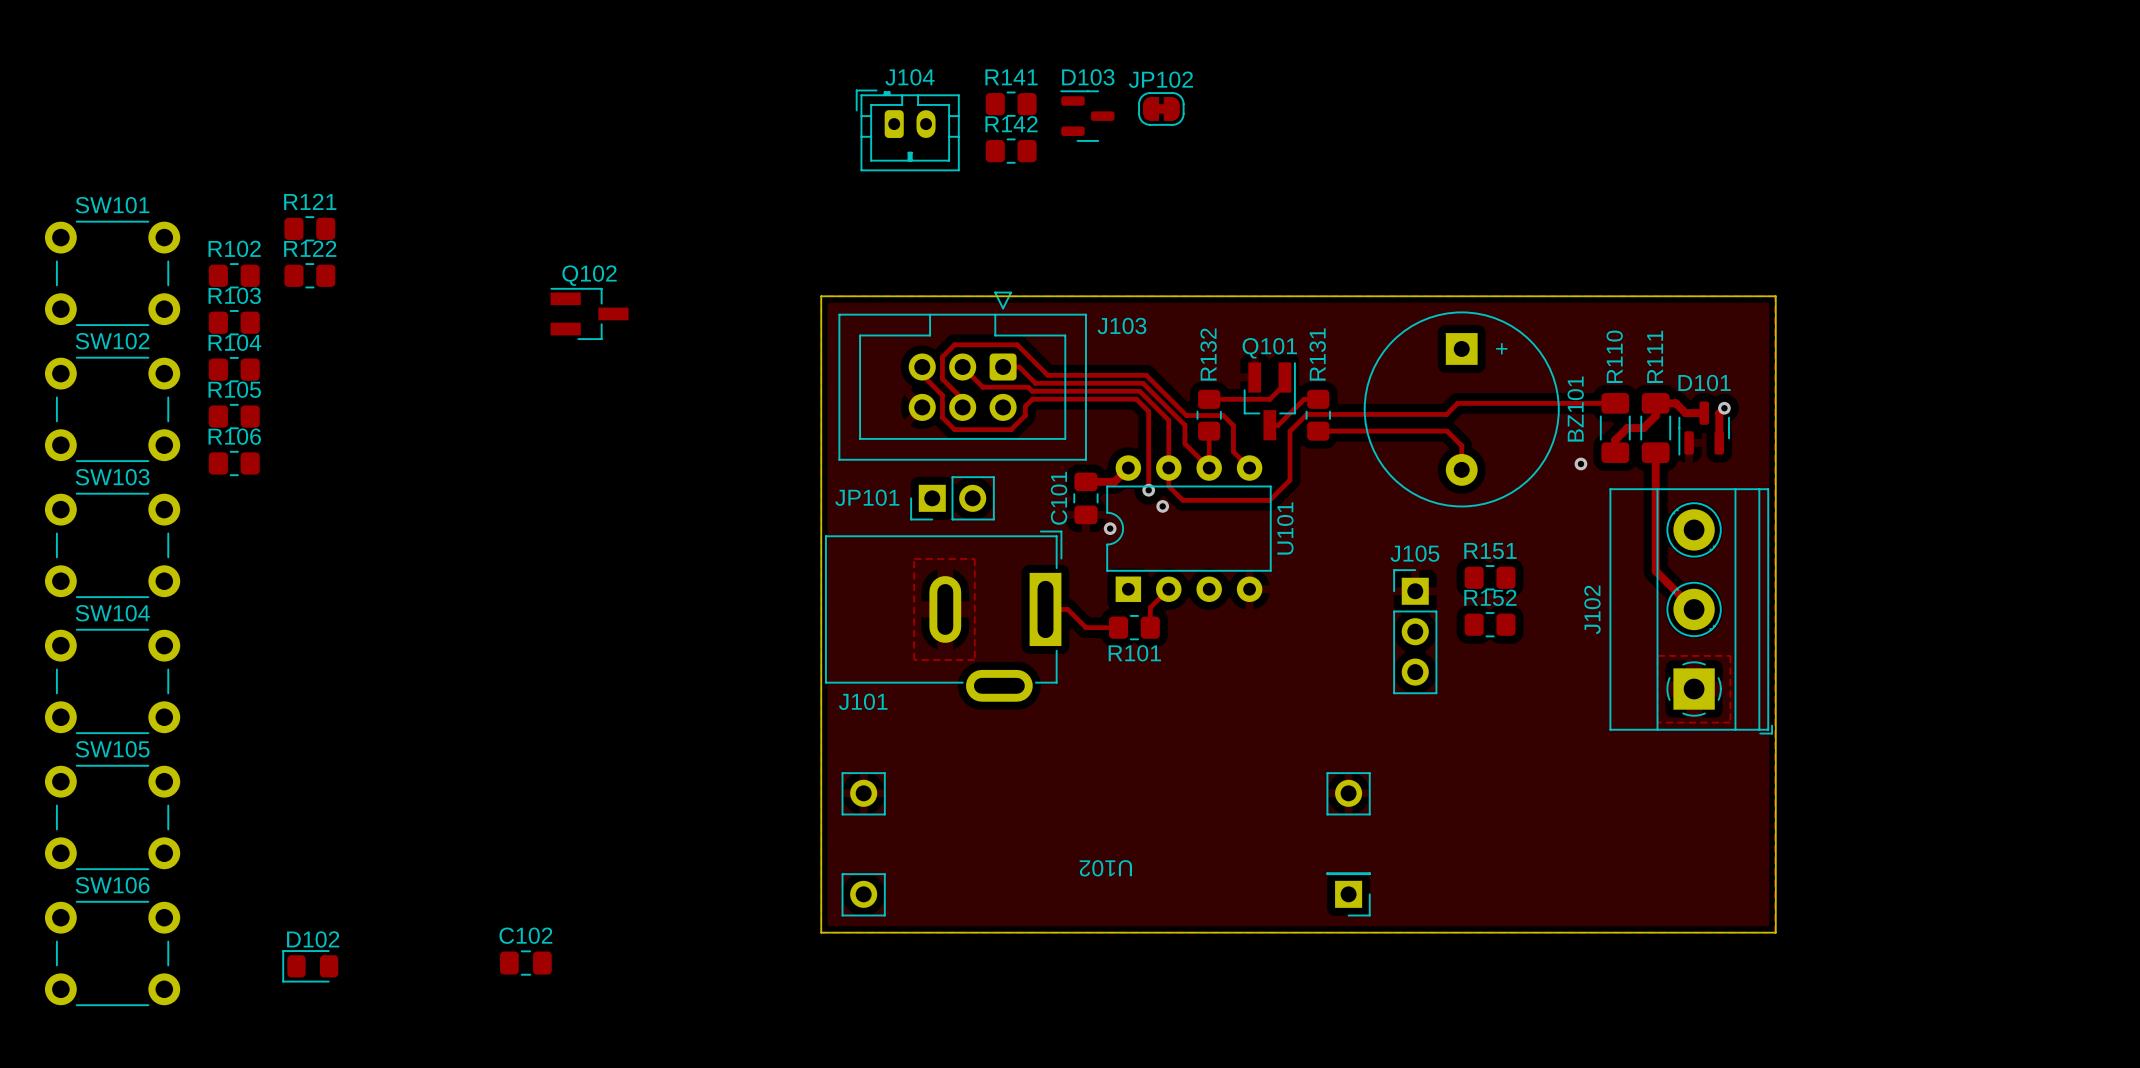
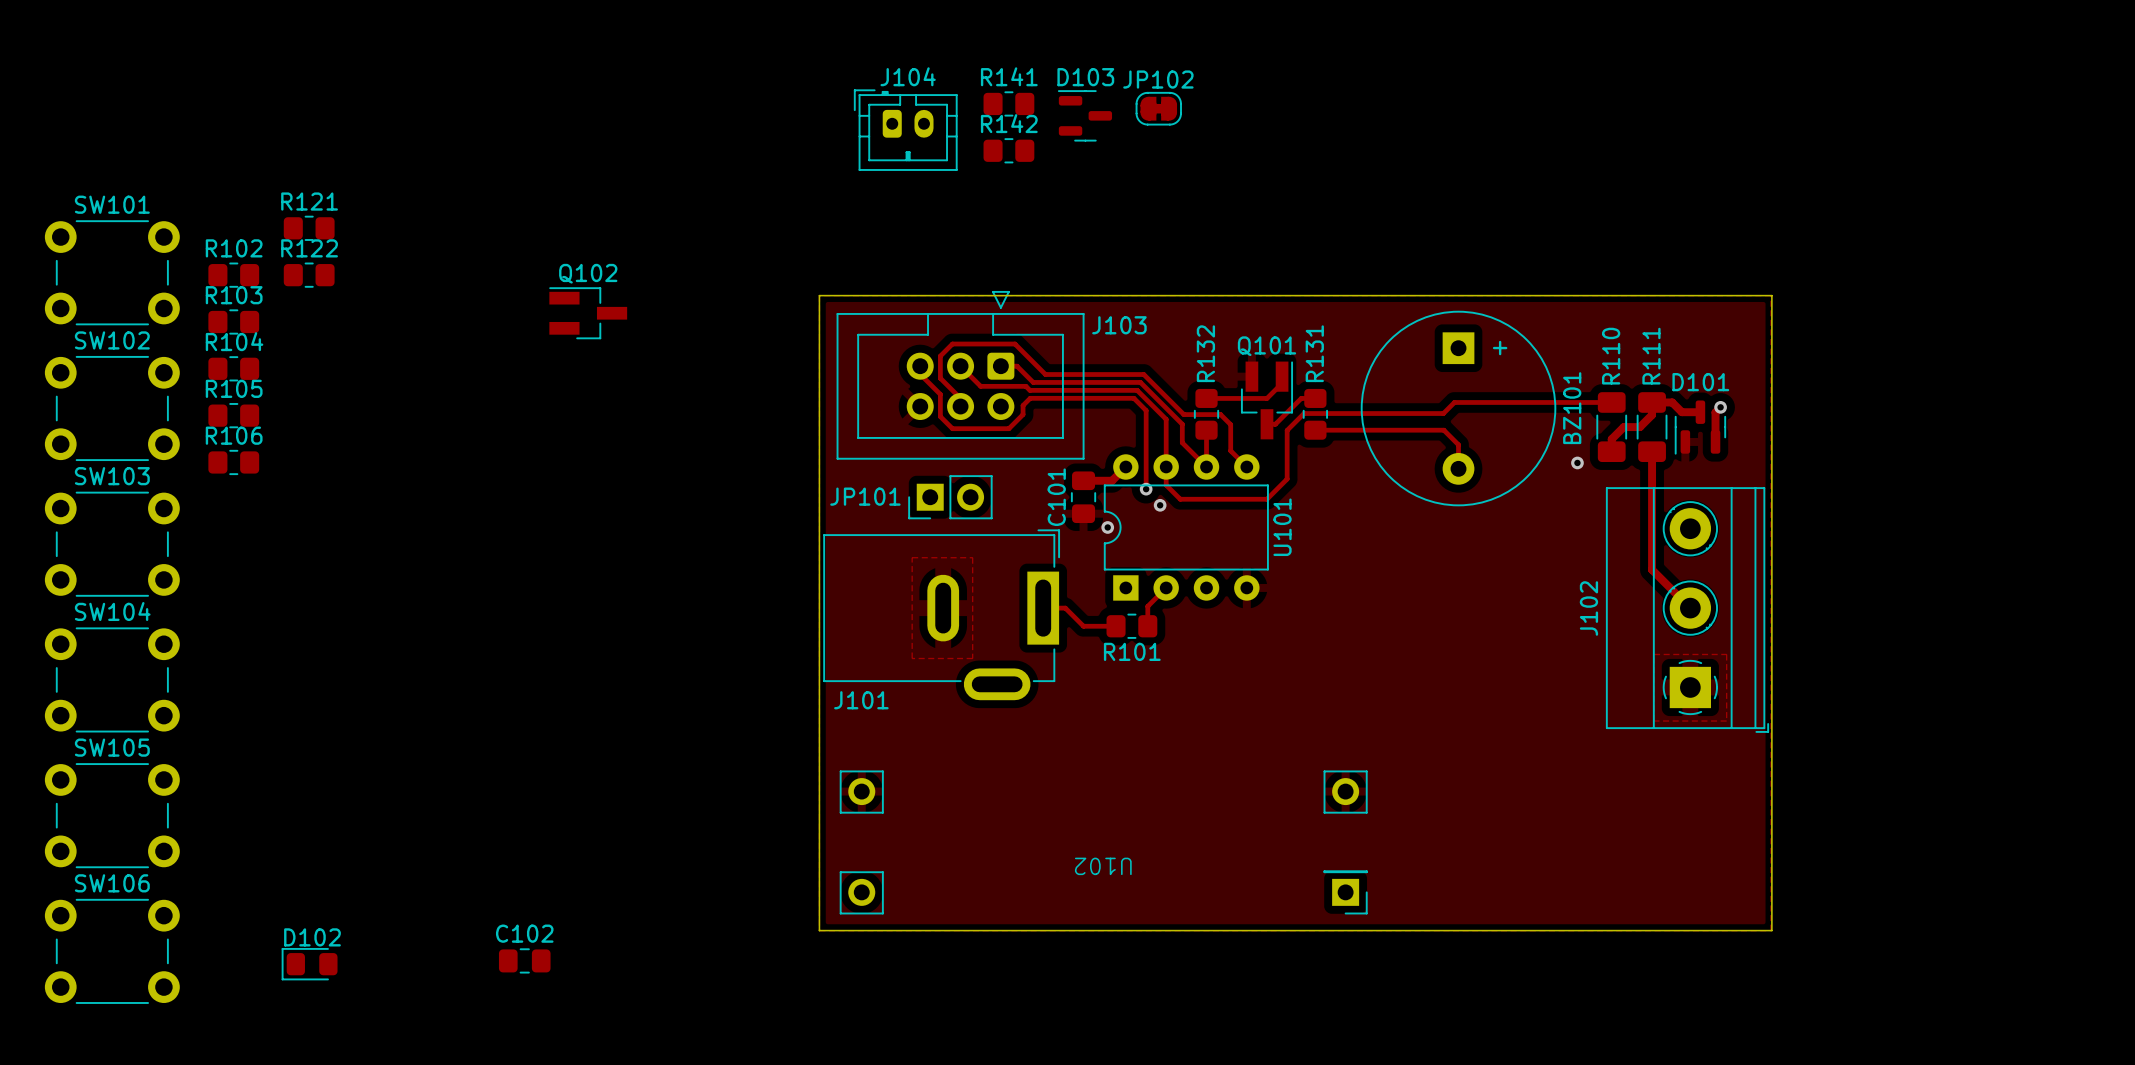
R151: (1490, 577) -> none
R152: (1490, 624) -> none
J105: (1415, 631) -> none

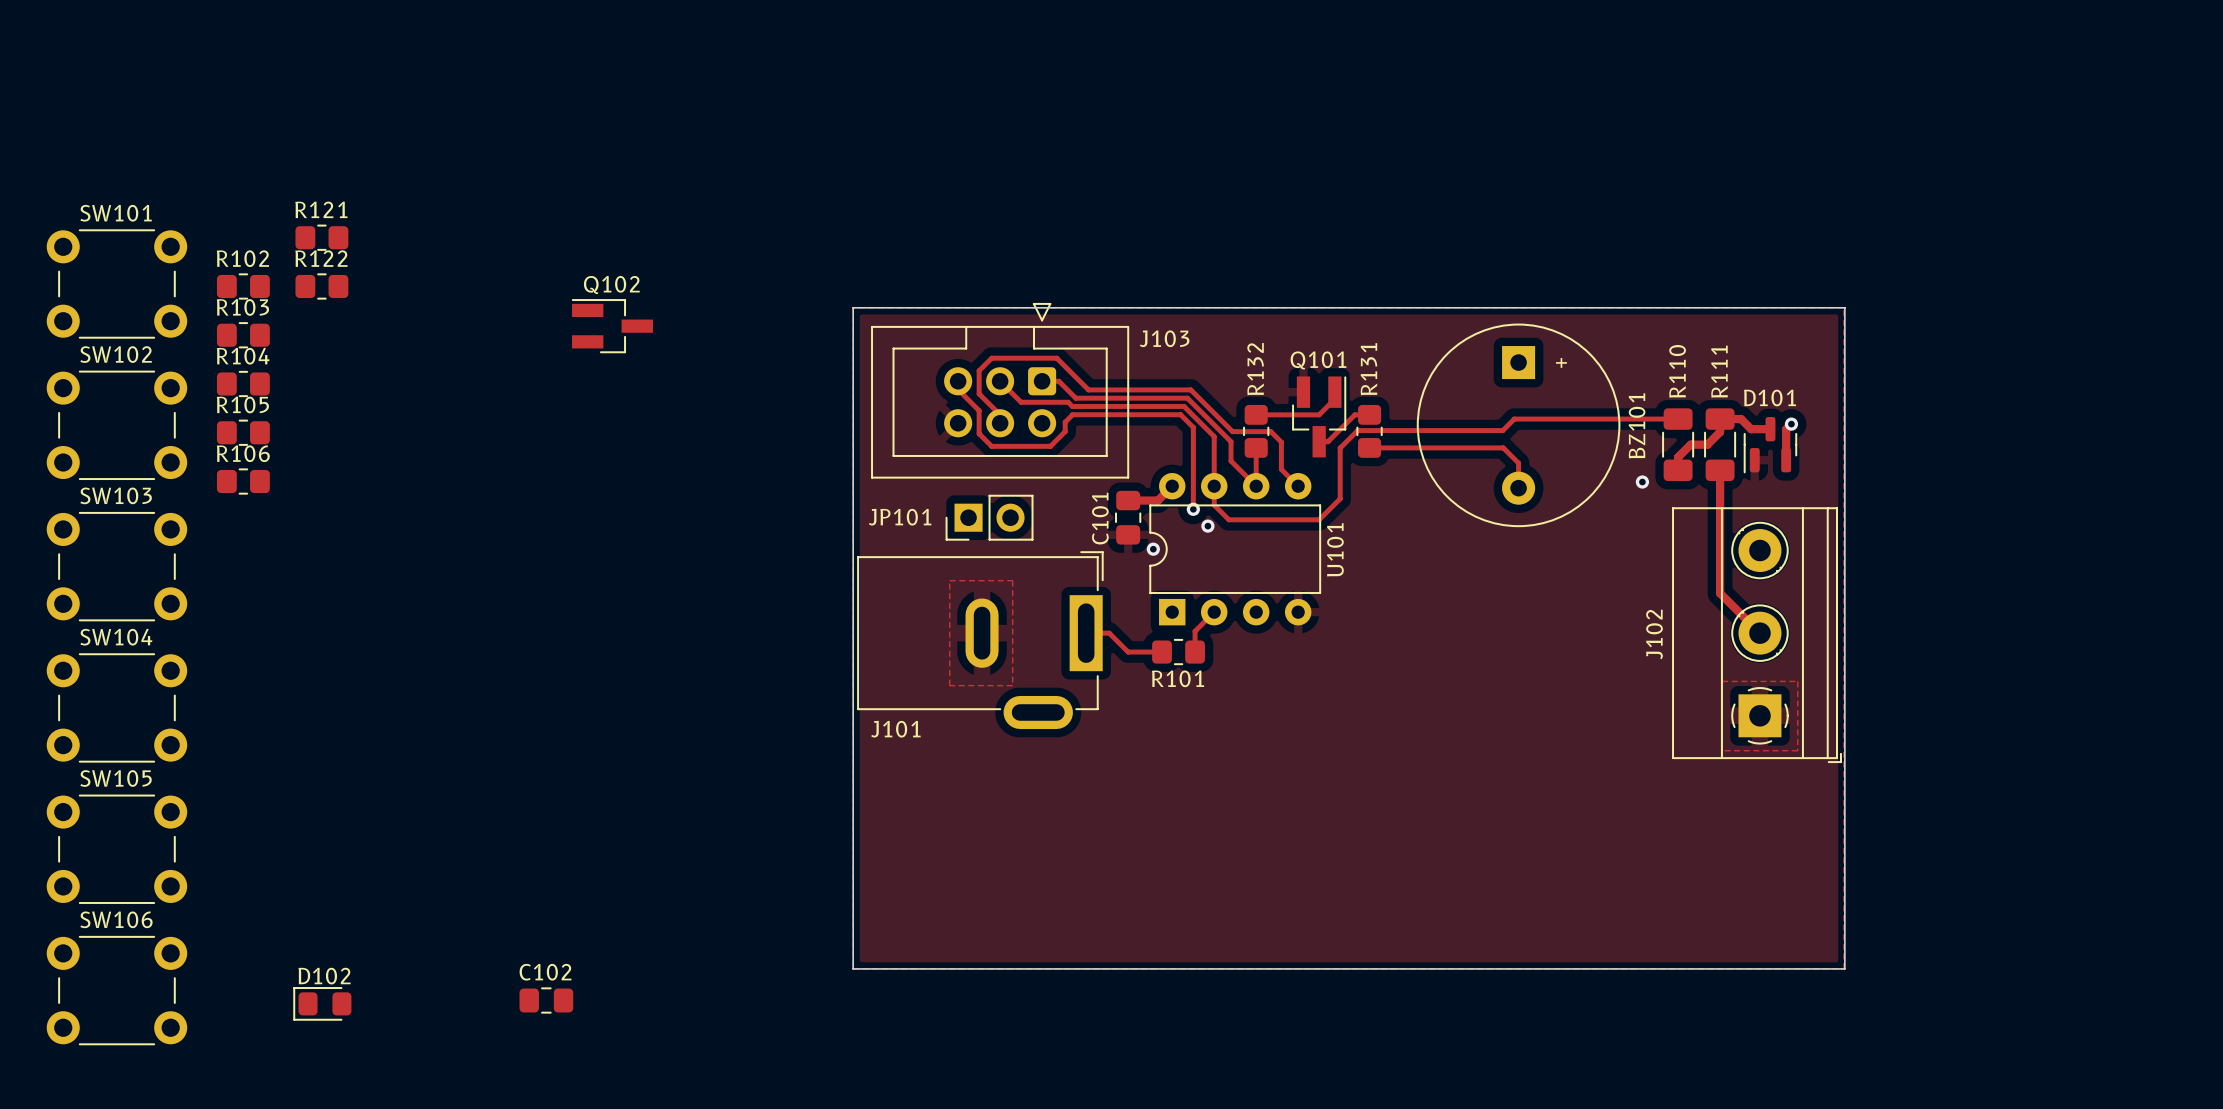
R141: (1008, 103) -> none
JP102: (1158, 108) -> none
D103: (1084, 115) -> none
J104: (905, 130) -> none
R142: (1008, 150) -> none
U102: (1103, 842) -> none

